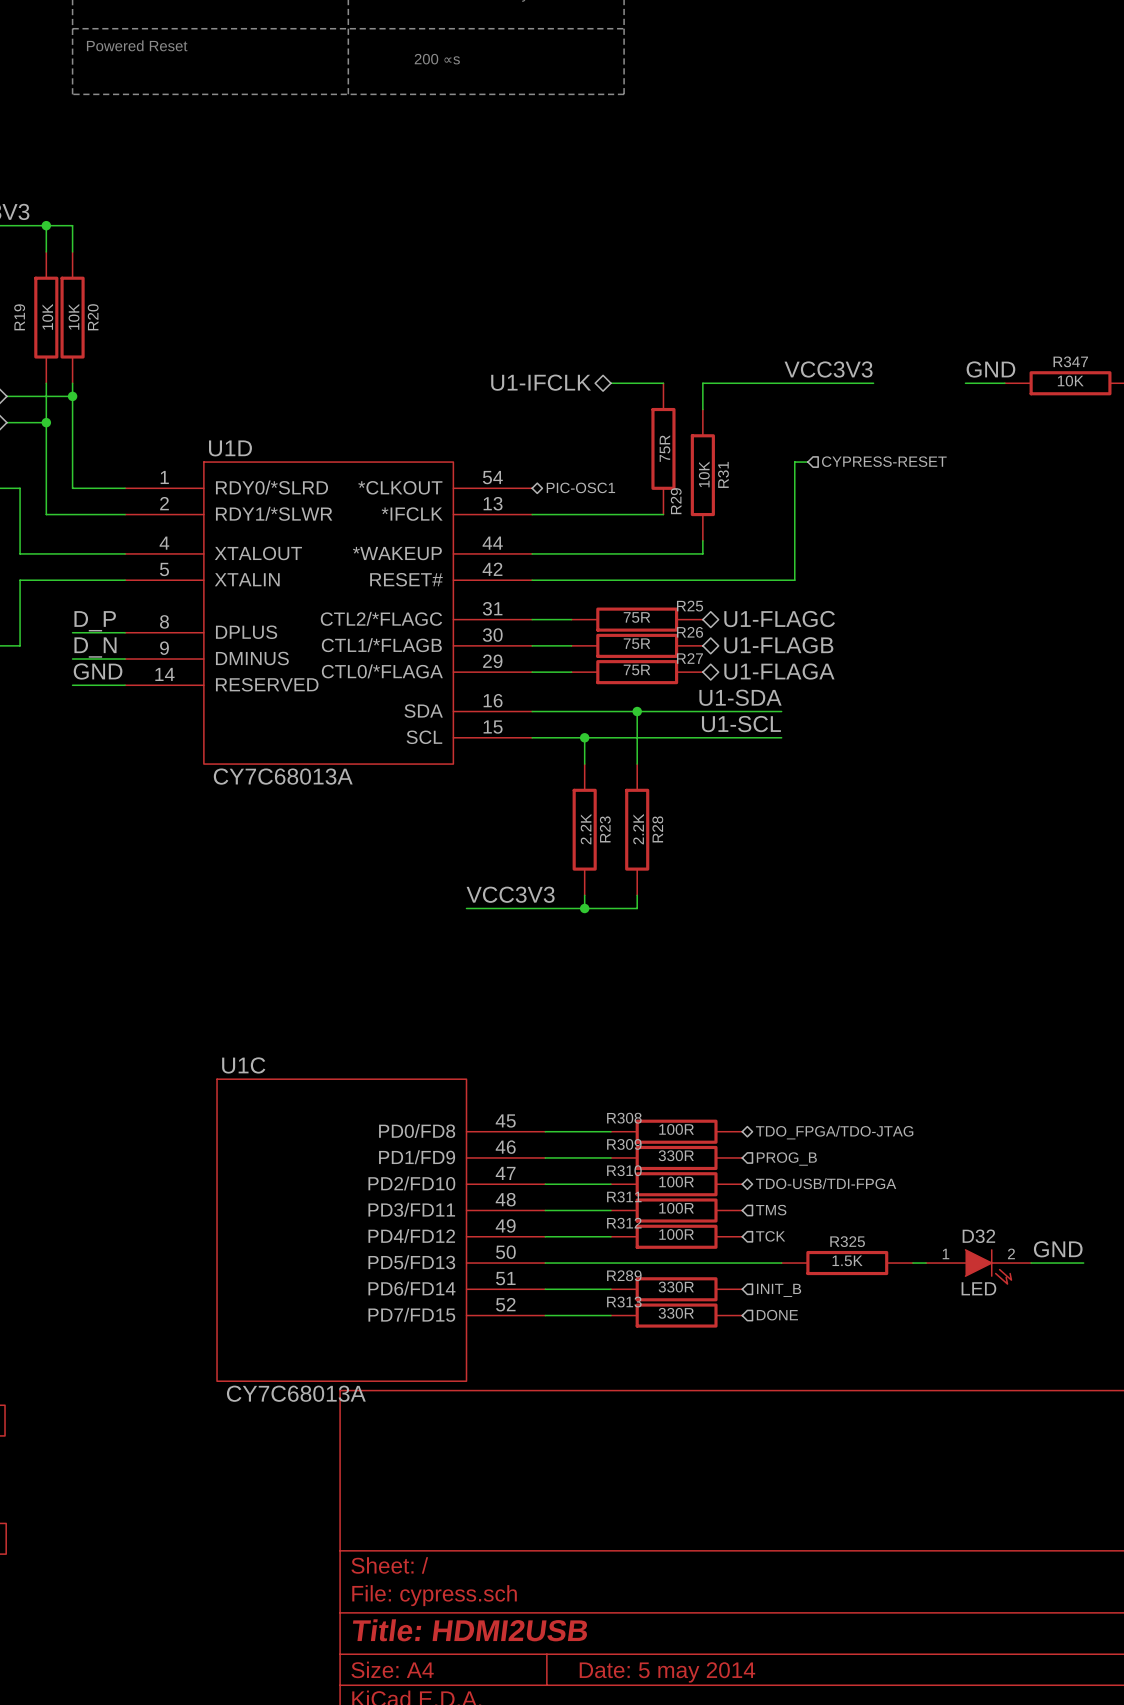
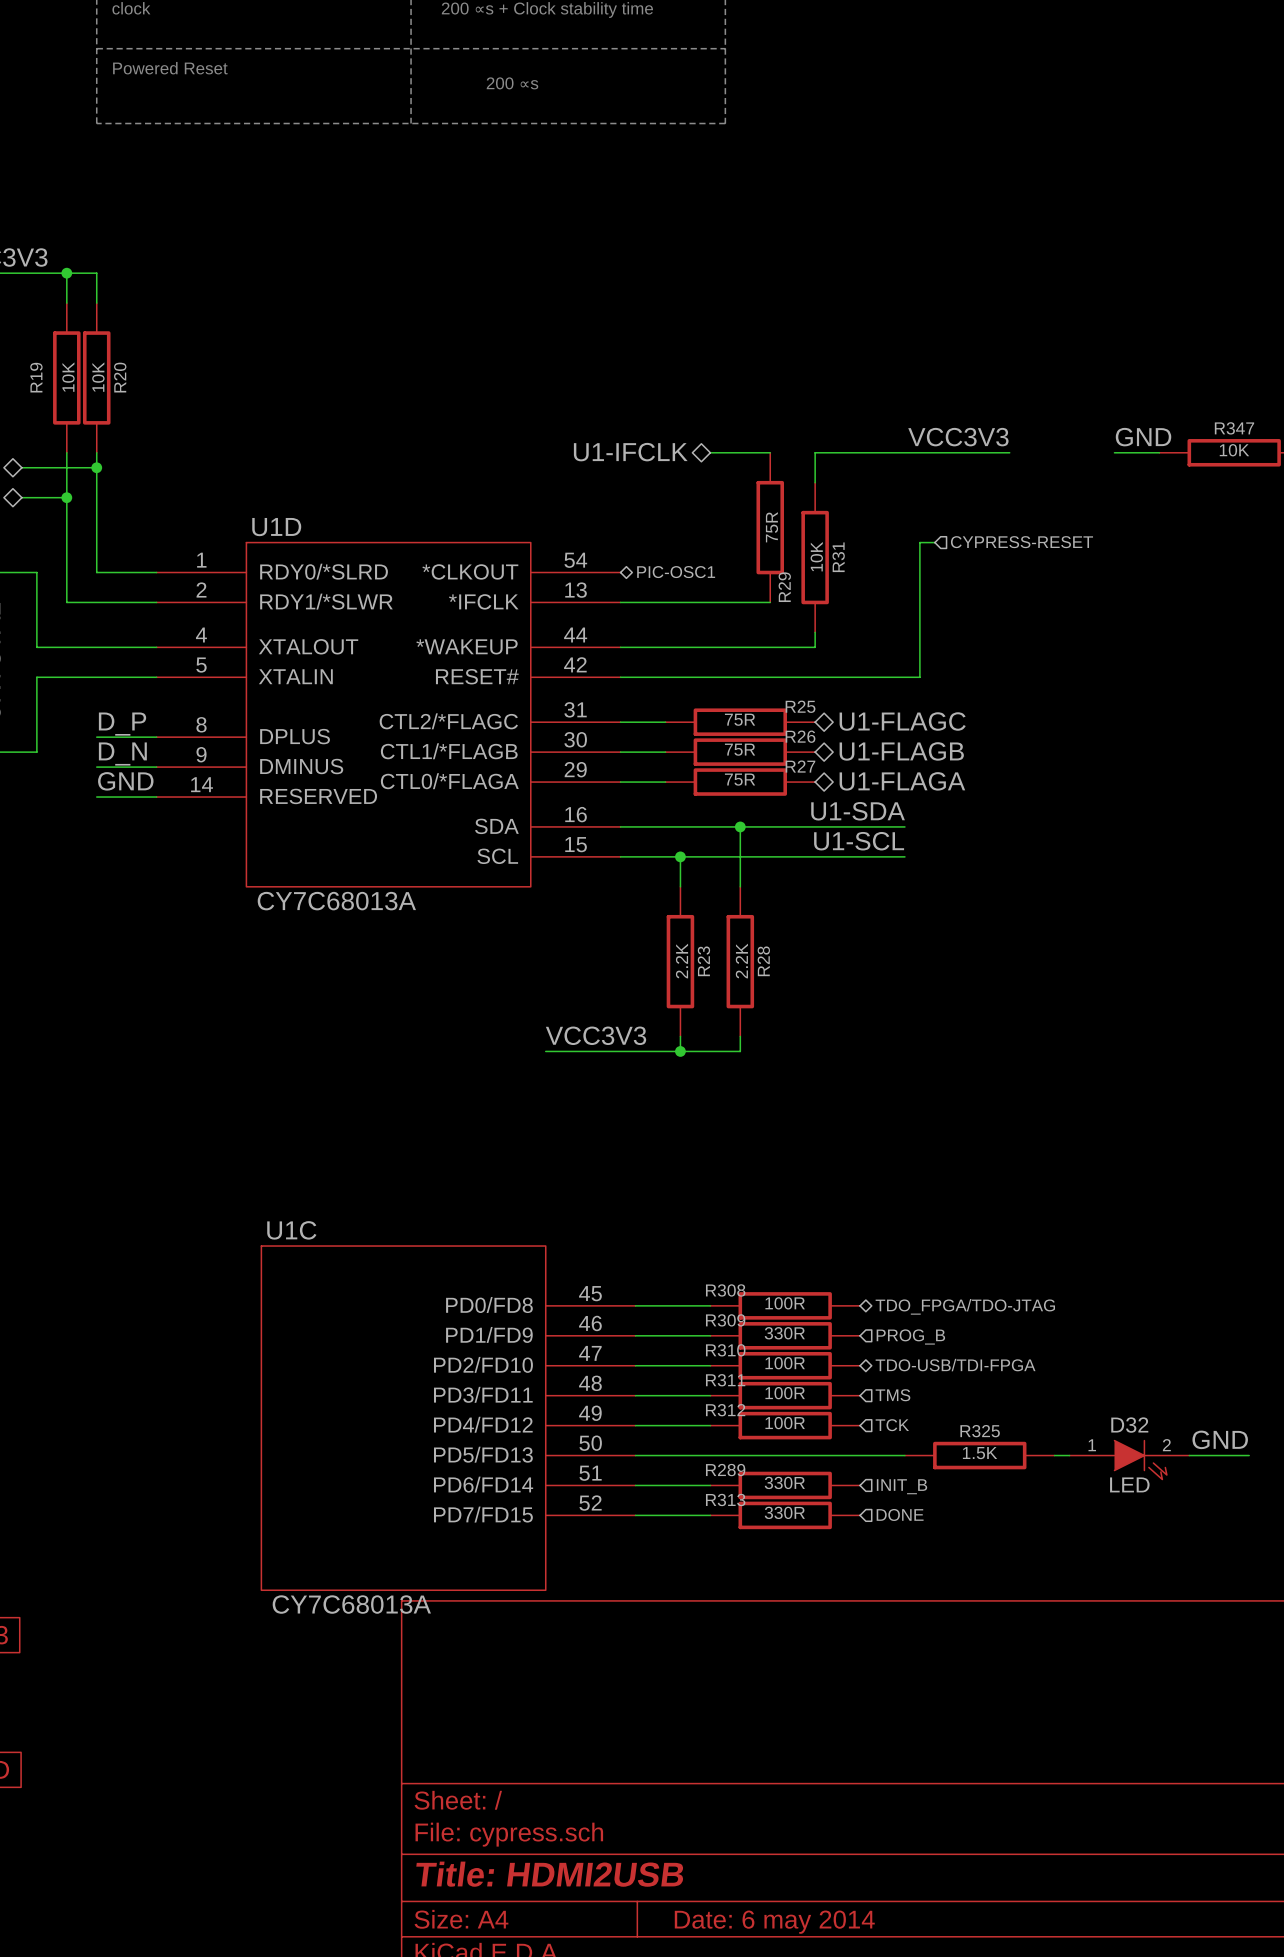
title block: Date: 5 may 2014 (667, 1672) -> Date: 6 may 2014 (774, 1922)

